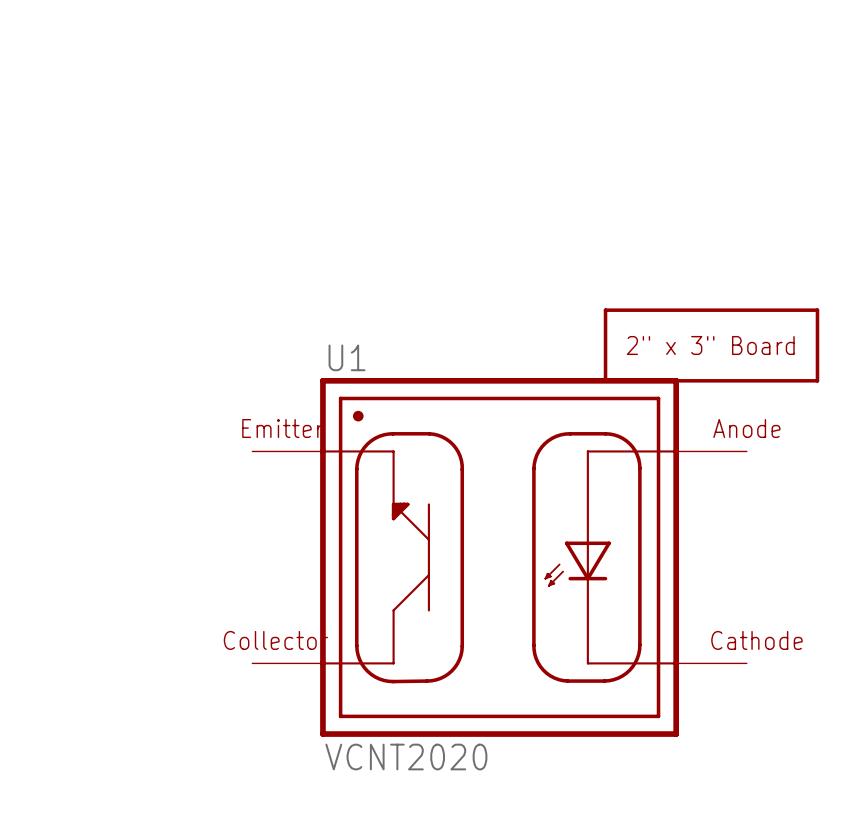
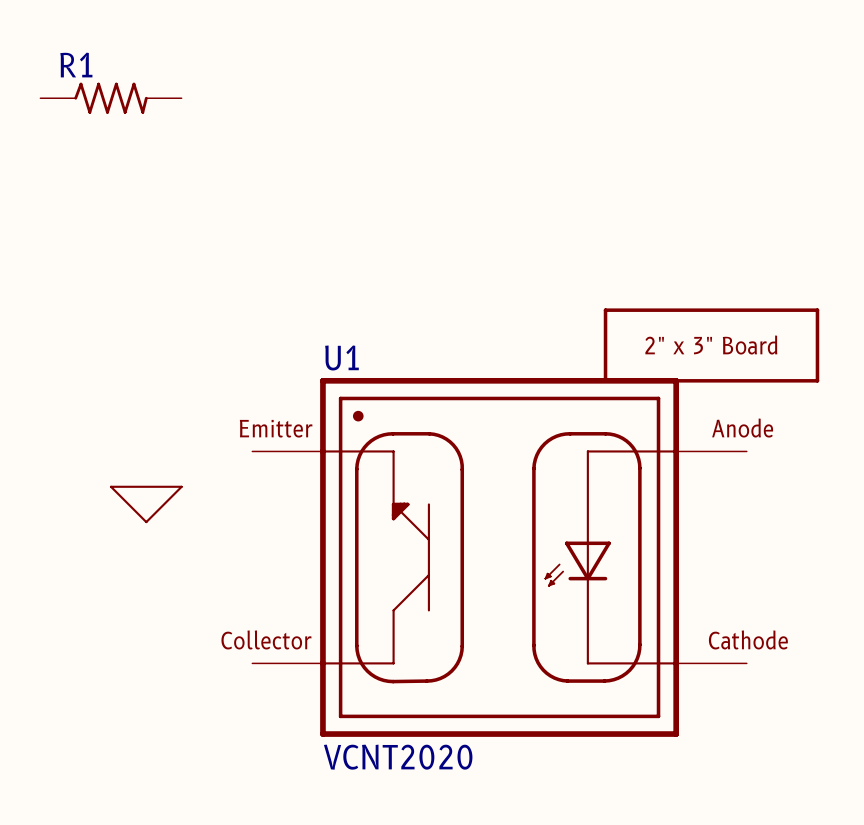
R1: none -> (111, 98)
power symbol: none -> (146, 504)

